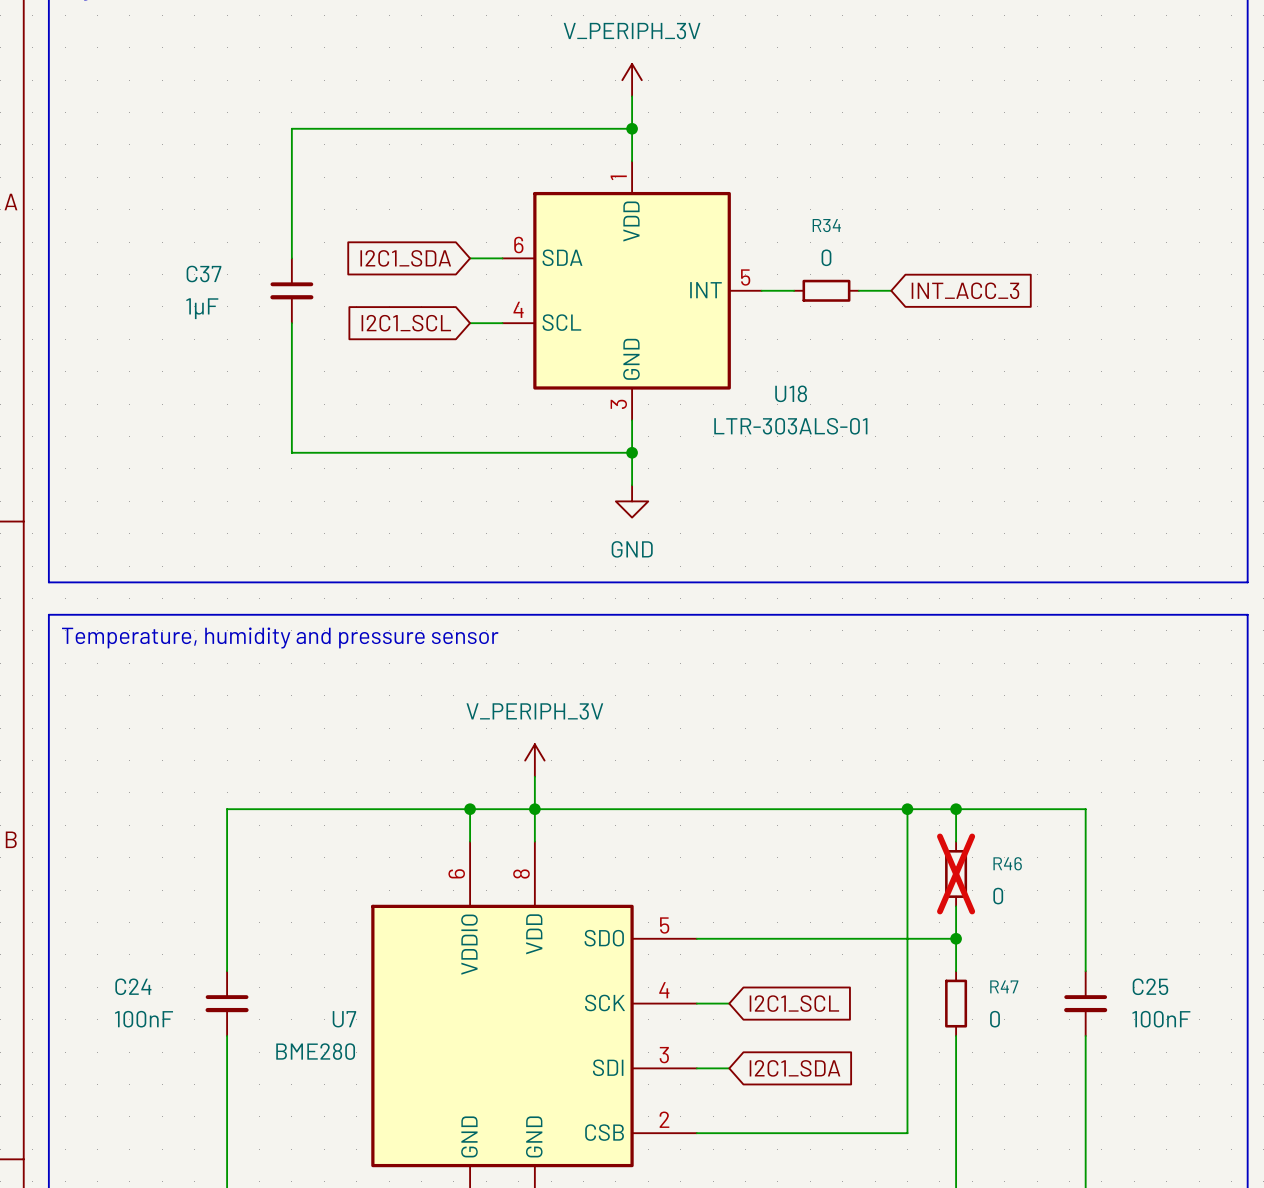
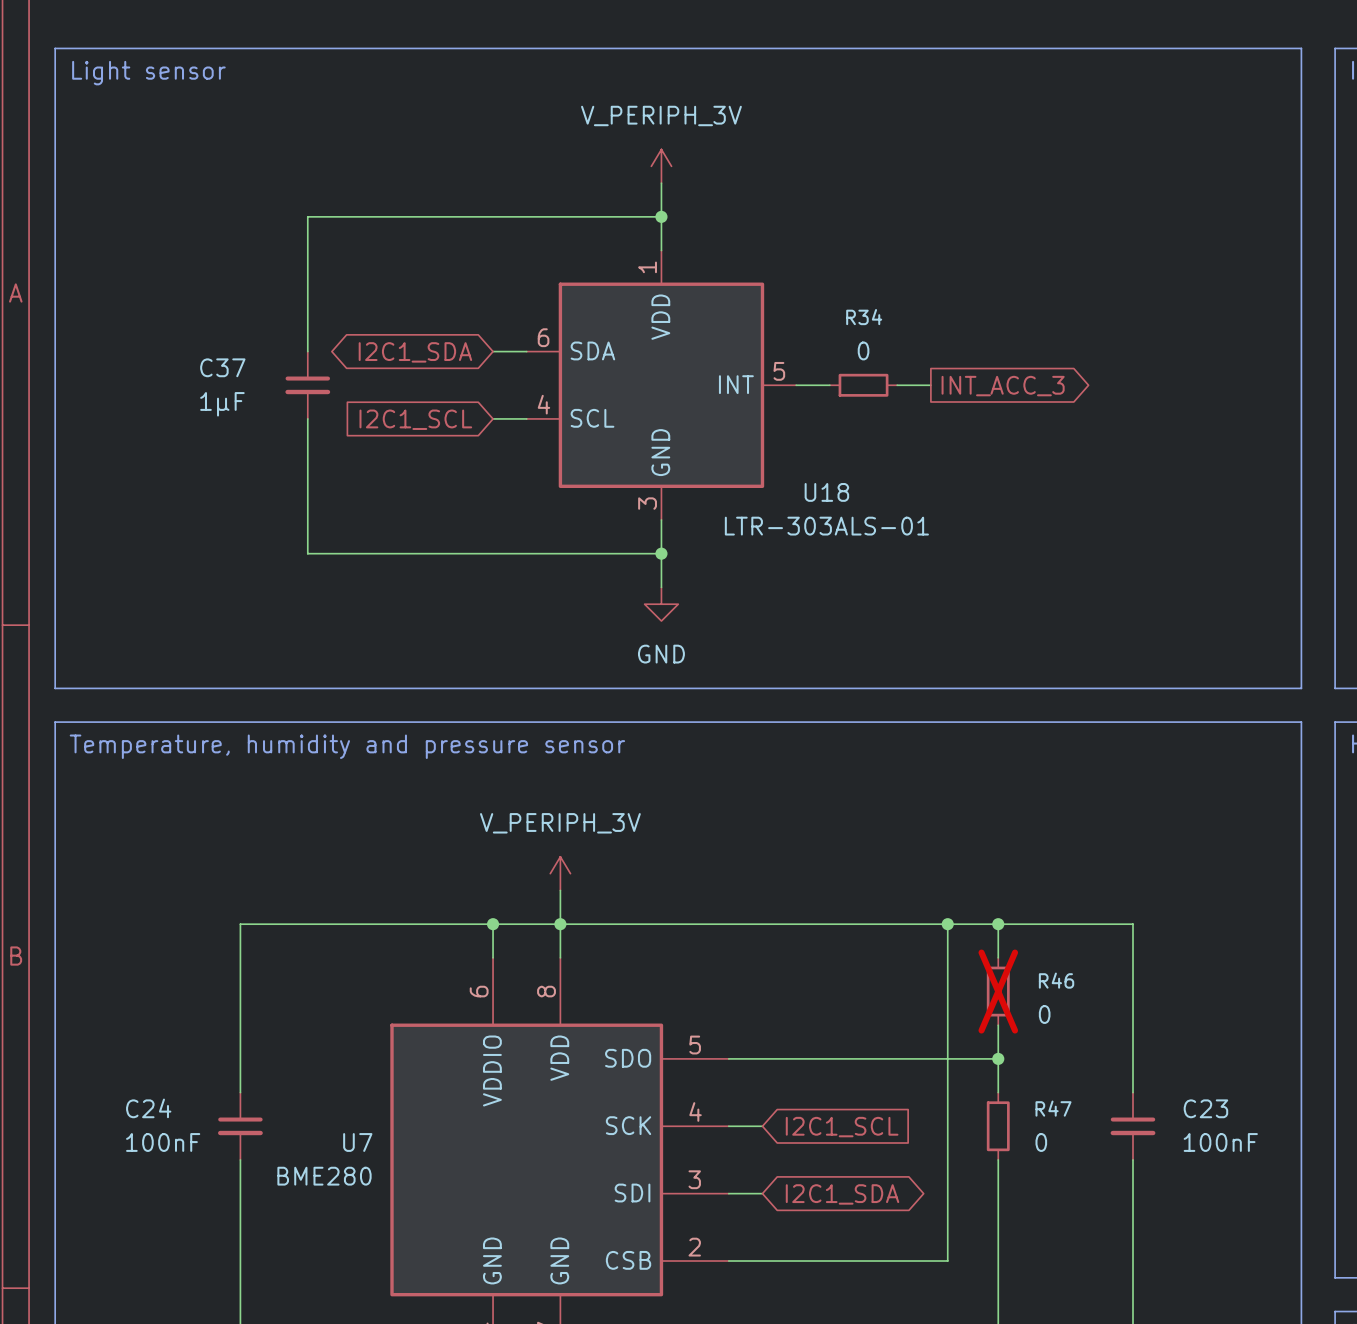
global label shape: input (405, 258) -> bidirectional (415, 352)
global label shape: input (965, 290) -> output (1003, 386)
C25 name: C25 (1150, 986) -> C23 (1205, 1108)
global label shape: input (794, 1068) -> bidirectional (842, 1194)

